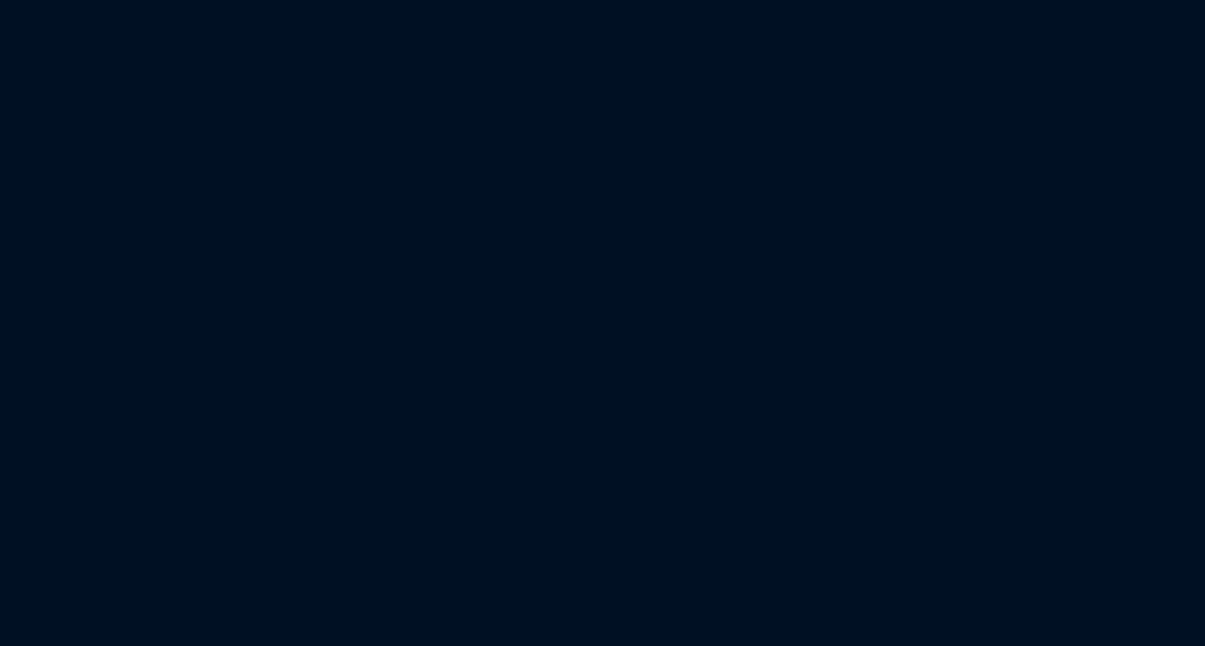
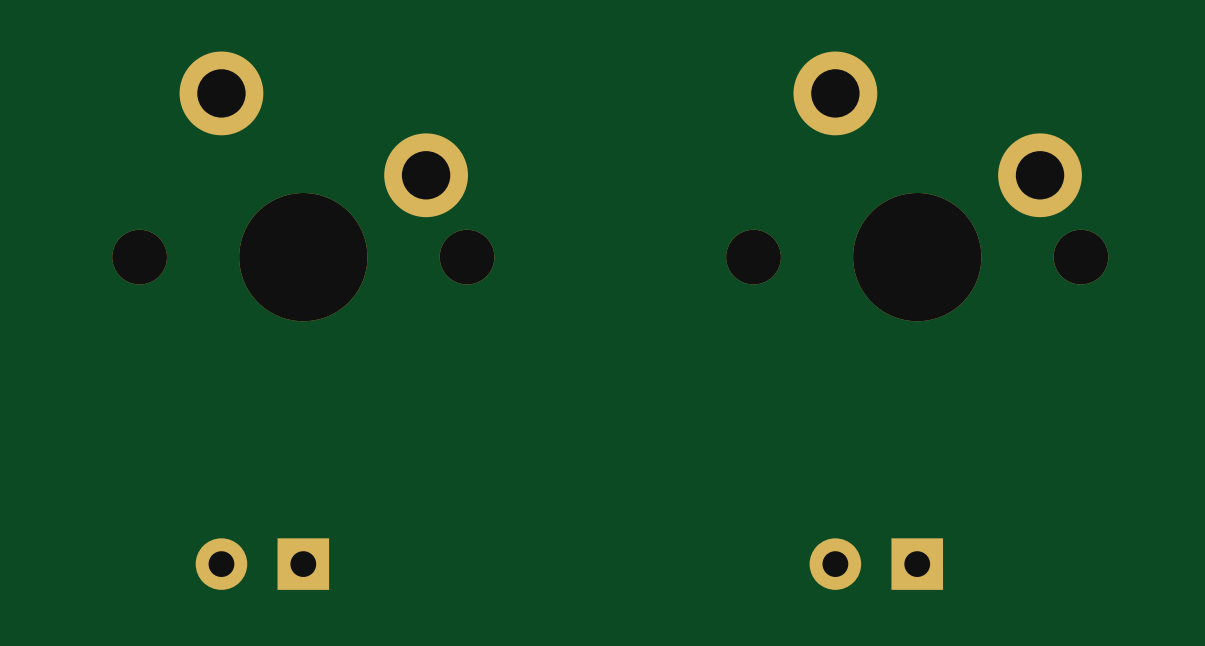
part: none -> (303, 186)
part: none -> (917, 186)
part: none -> (262, 564)
part: none -> (876, 564)

